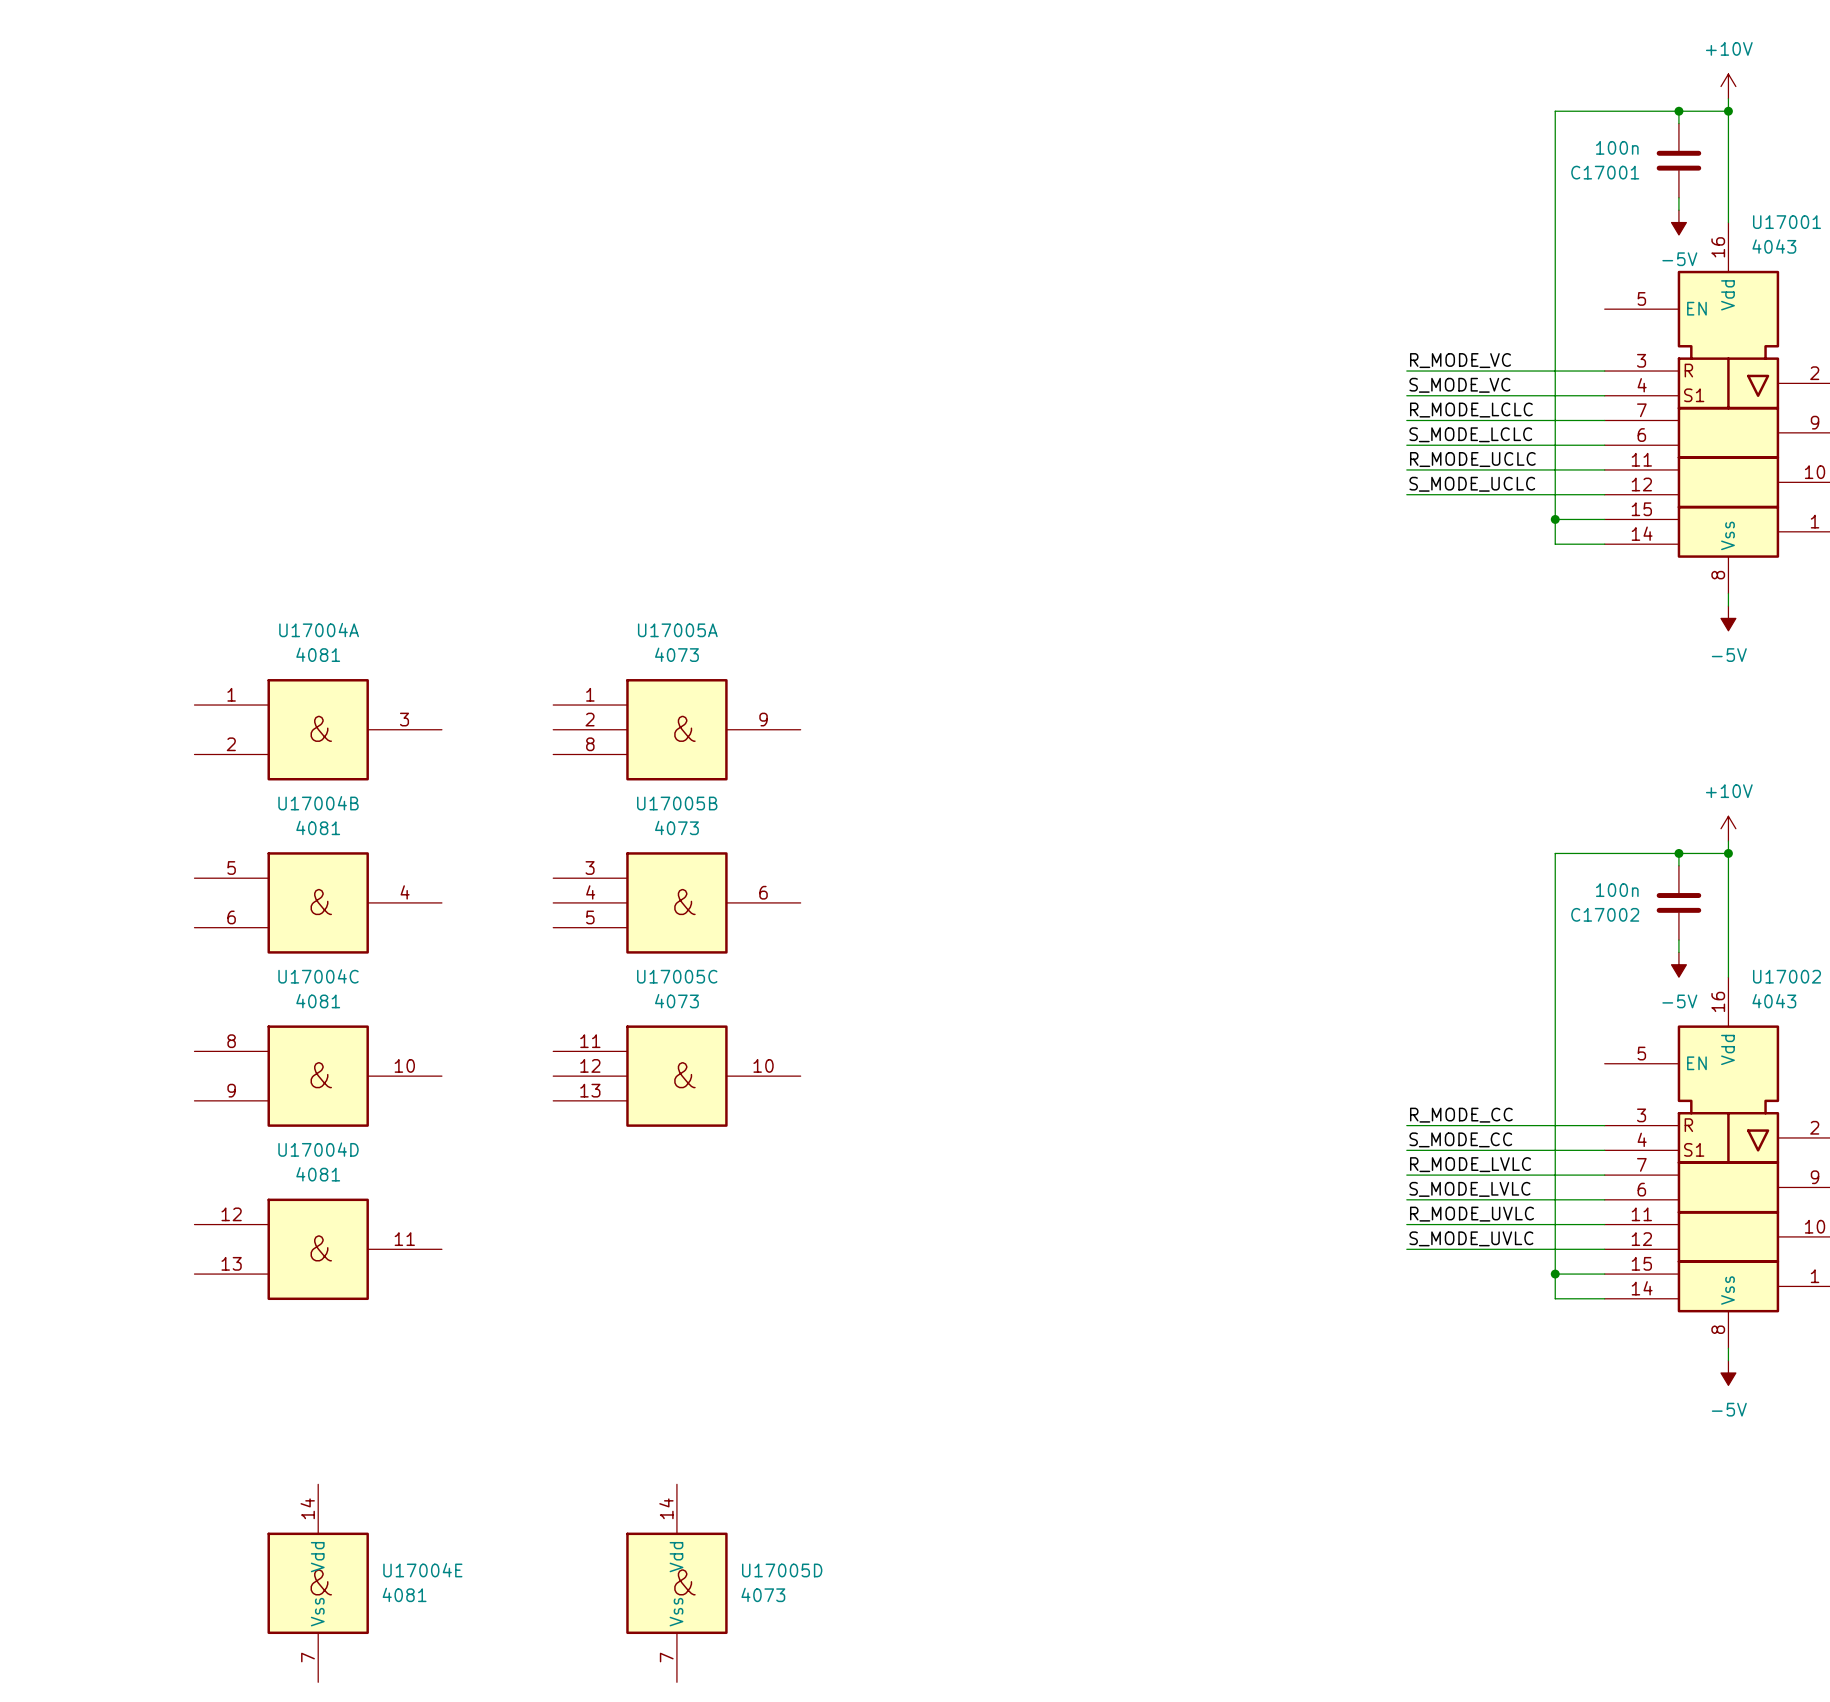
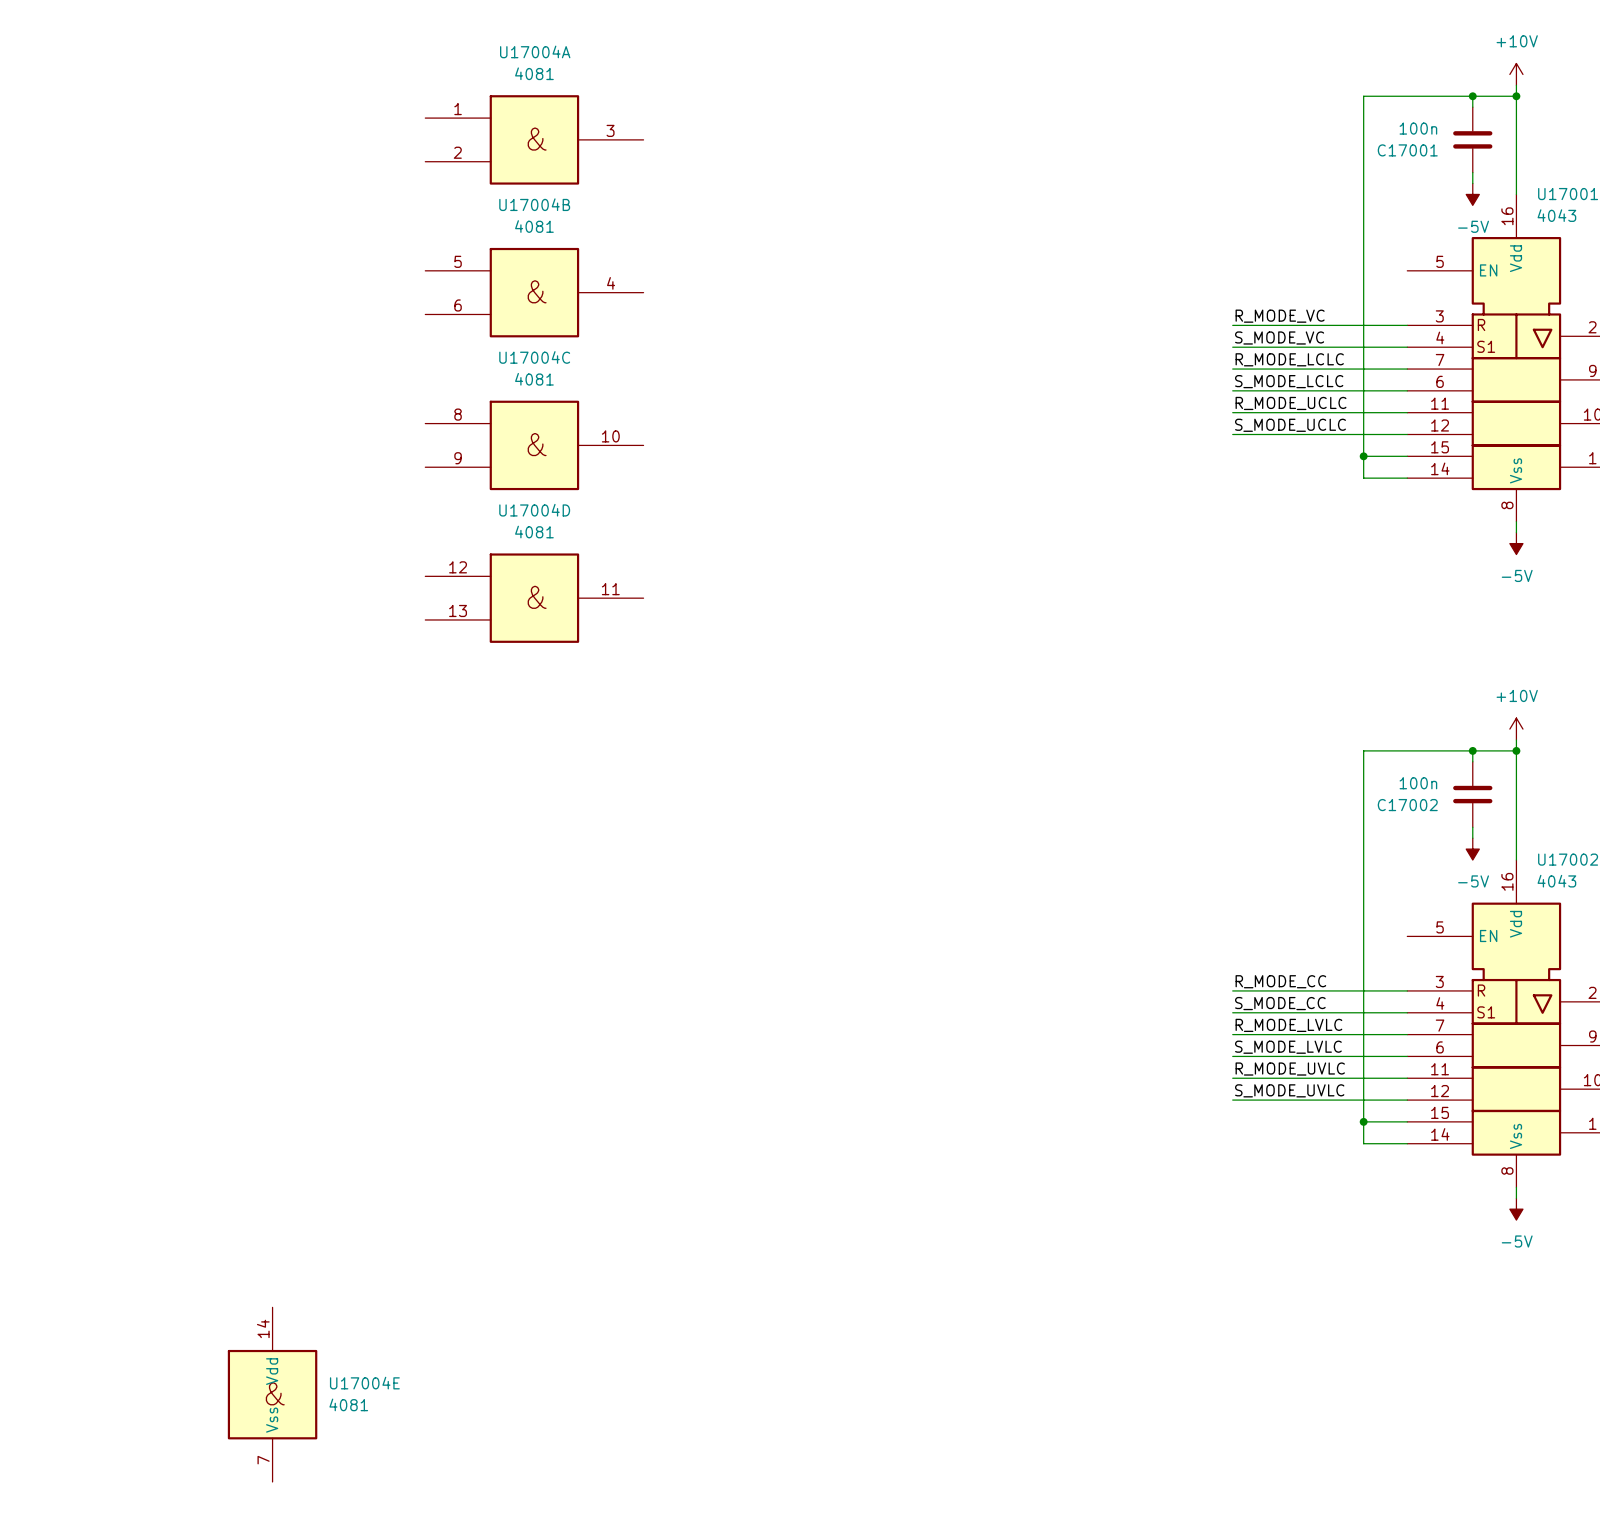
U17004A position: (318, 729) -> (534, 139)
U17005A: 4073 (676, 729) -> none
U17004B position: (318, 902) -> (534, 292)
U17005B: 4073 (676, 902) -> none
U17004C position: (318, 1076) -> (534, 445)
U17005C: 4073 (676, 1076) -> none
U17004D position: (318, 1249) -> (534, 598)
U17005D: 4073 (676, 1583) -> none

